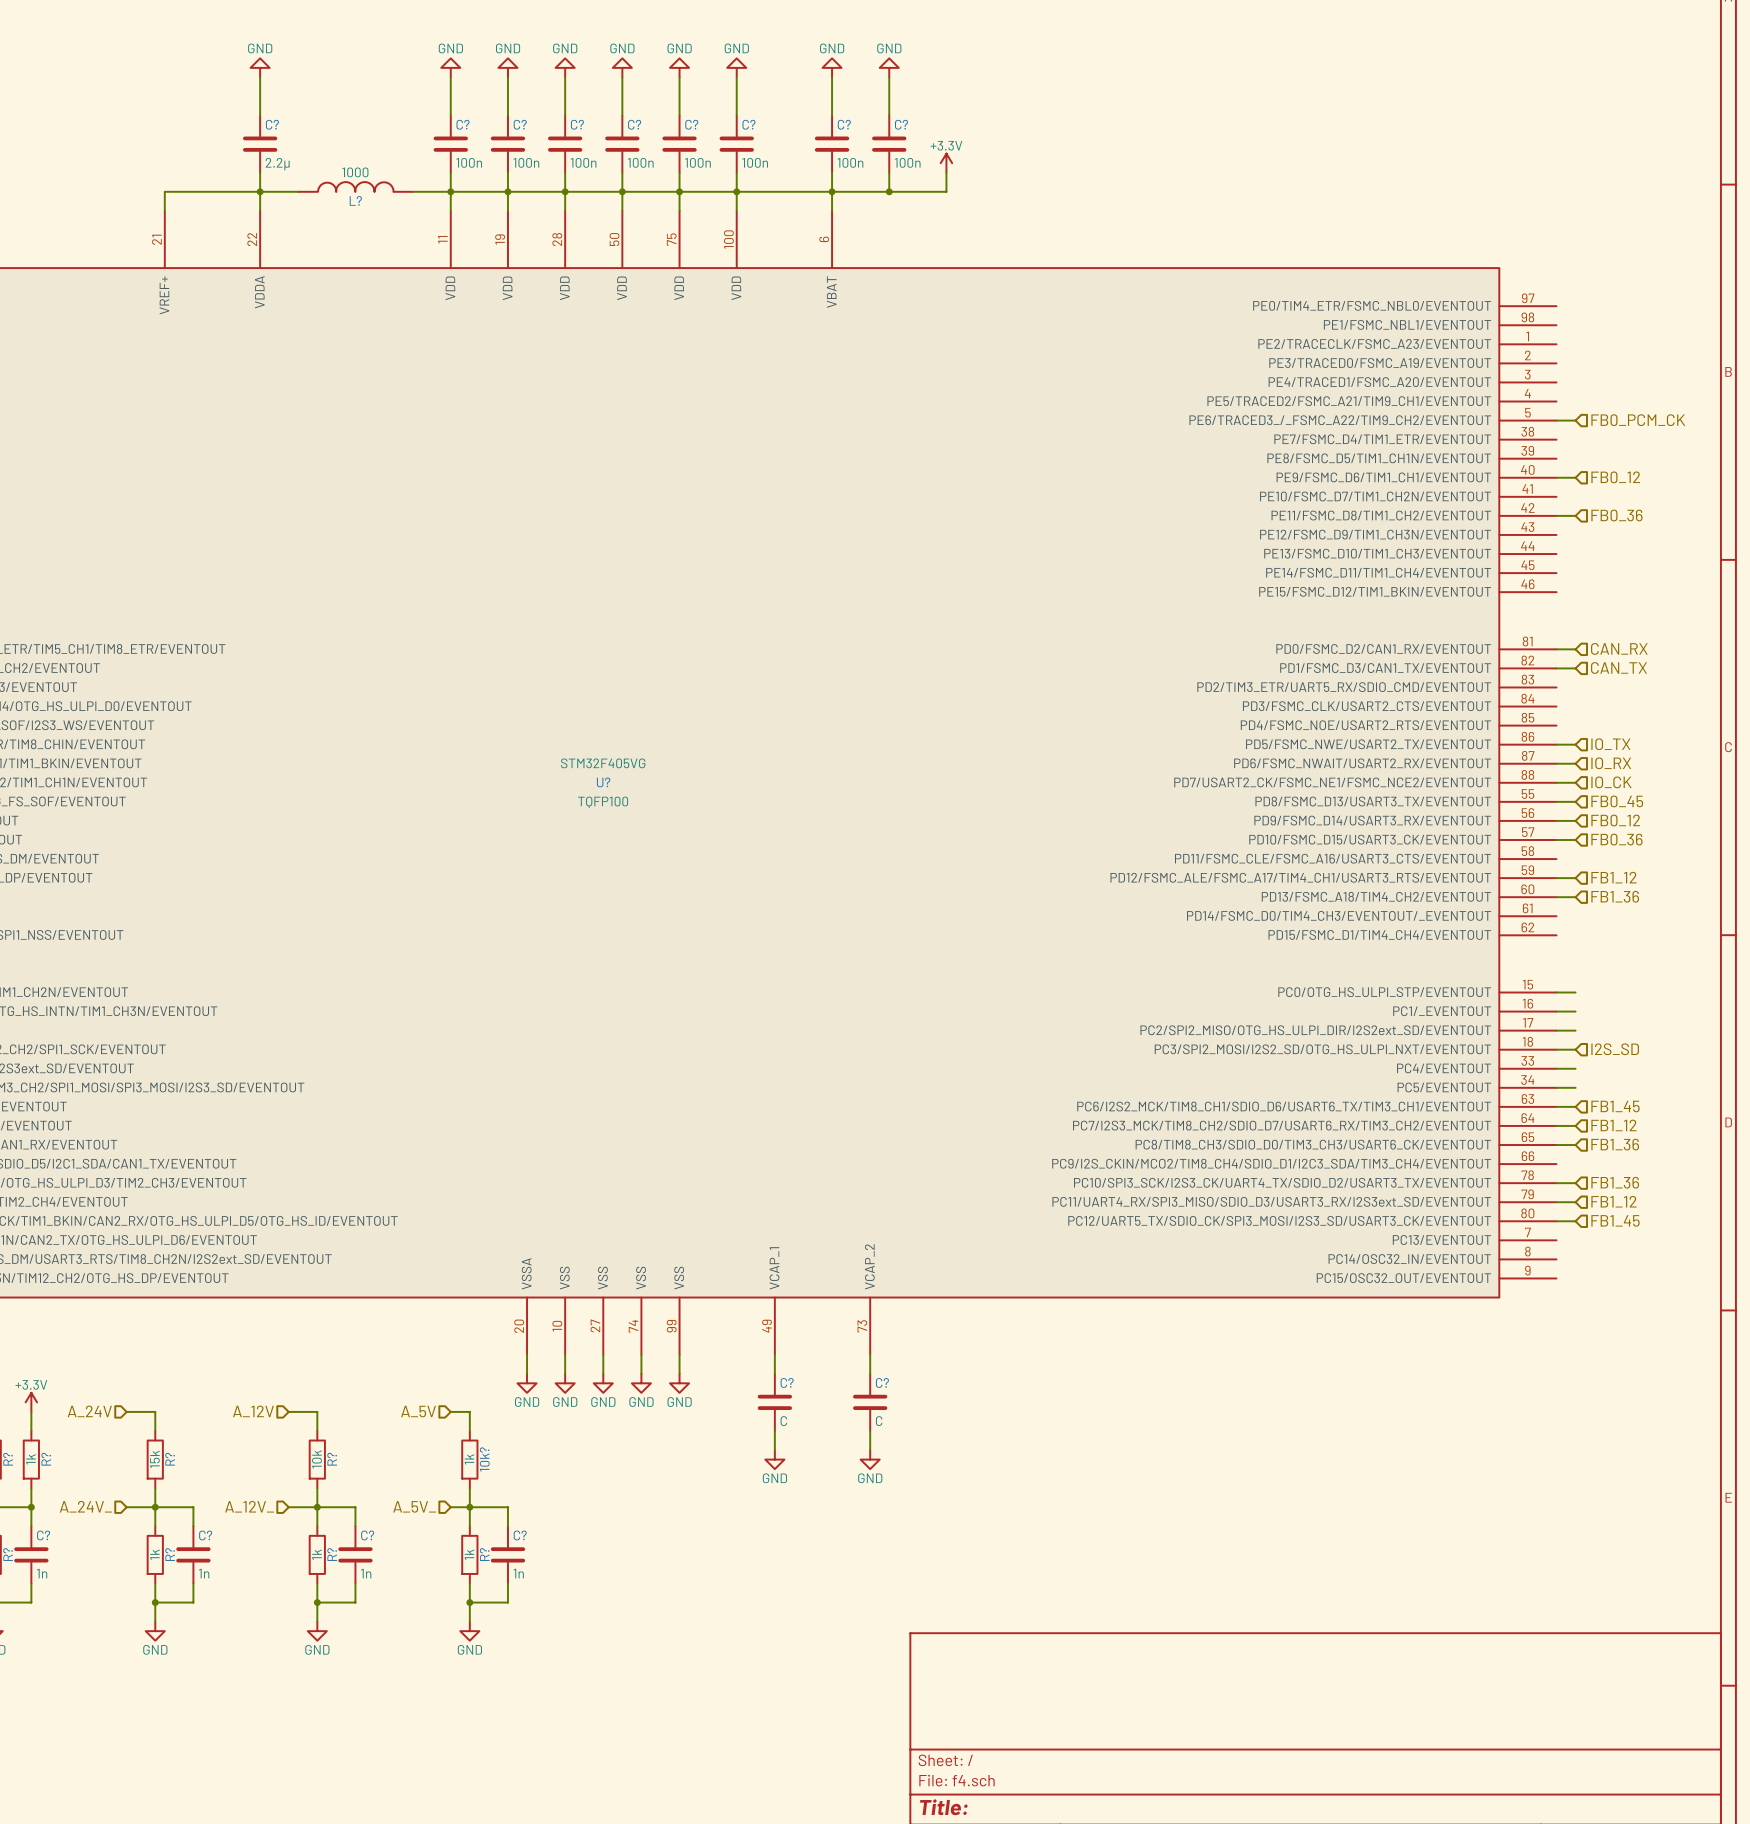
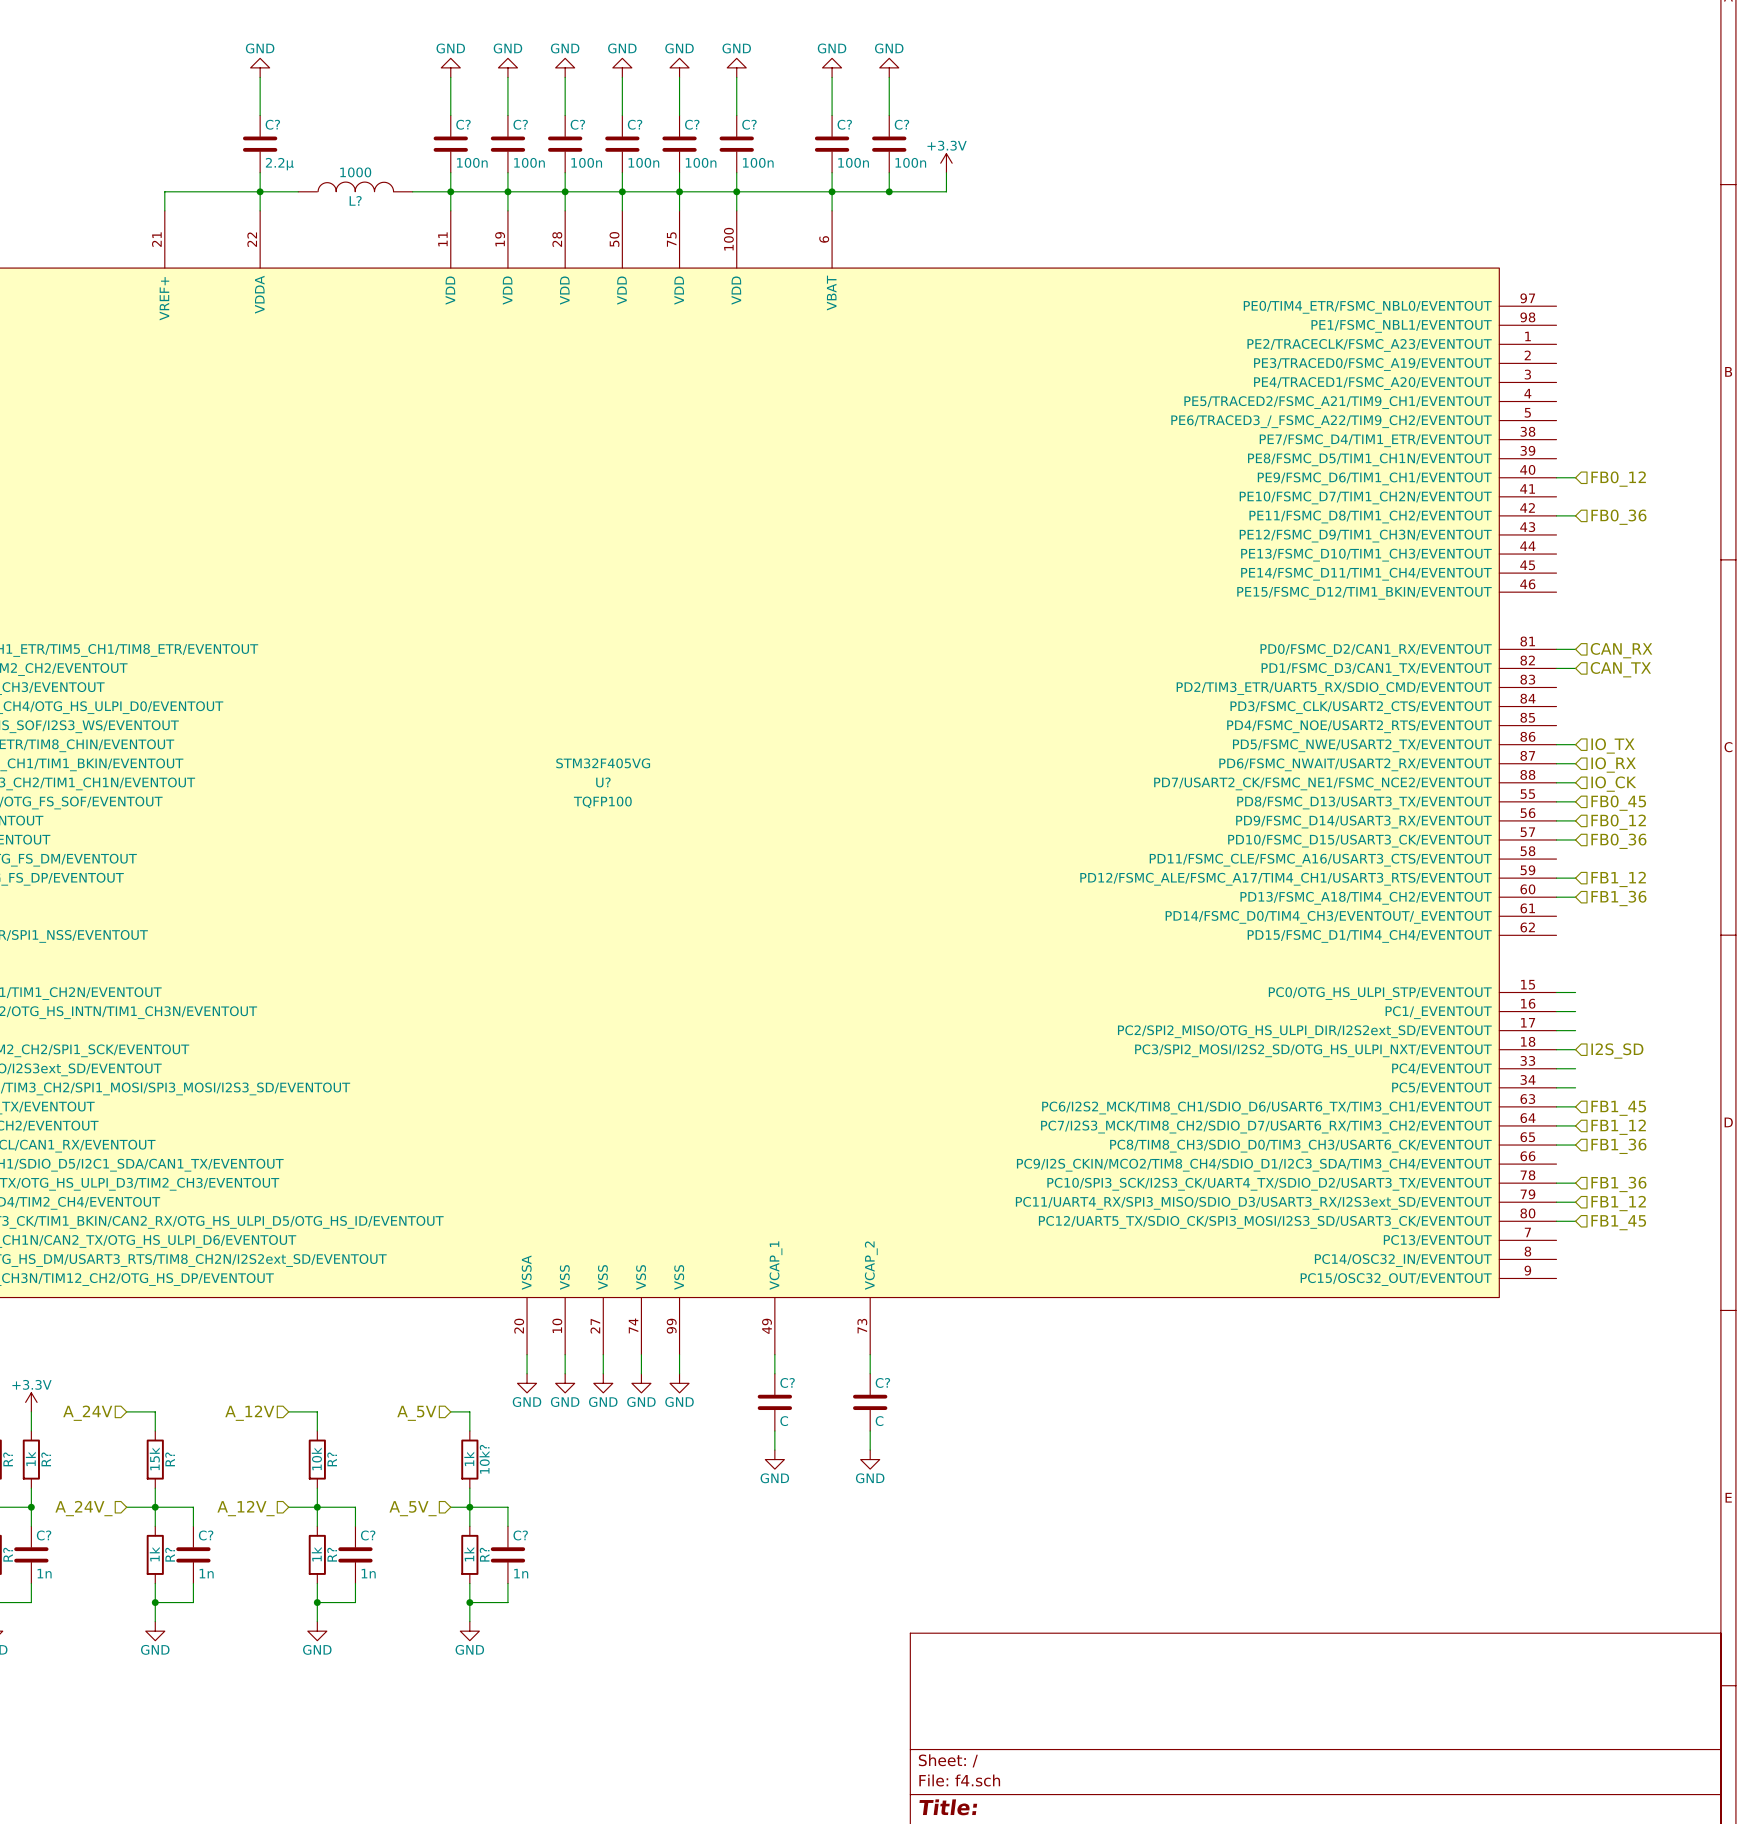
wire: (1556, 420) (1575, 420) -> none
hierarchical label: FB0_PCM_CK (1638, 420) -> none

